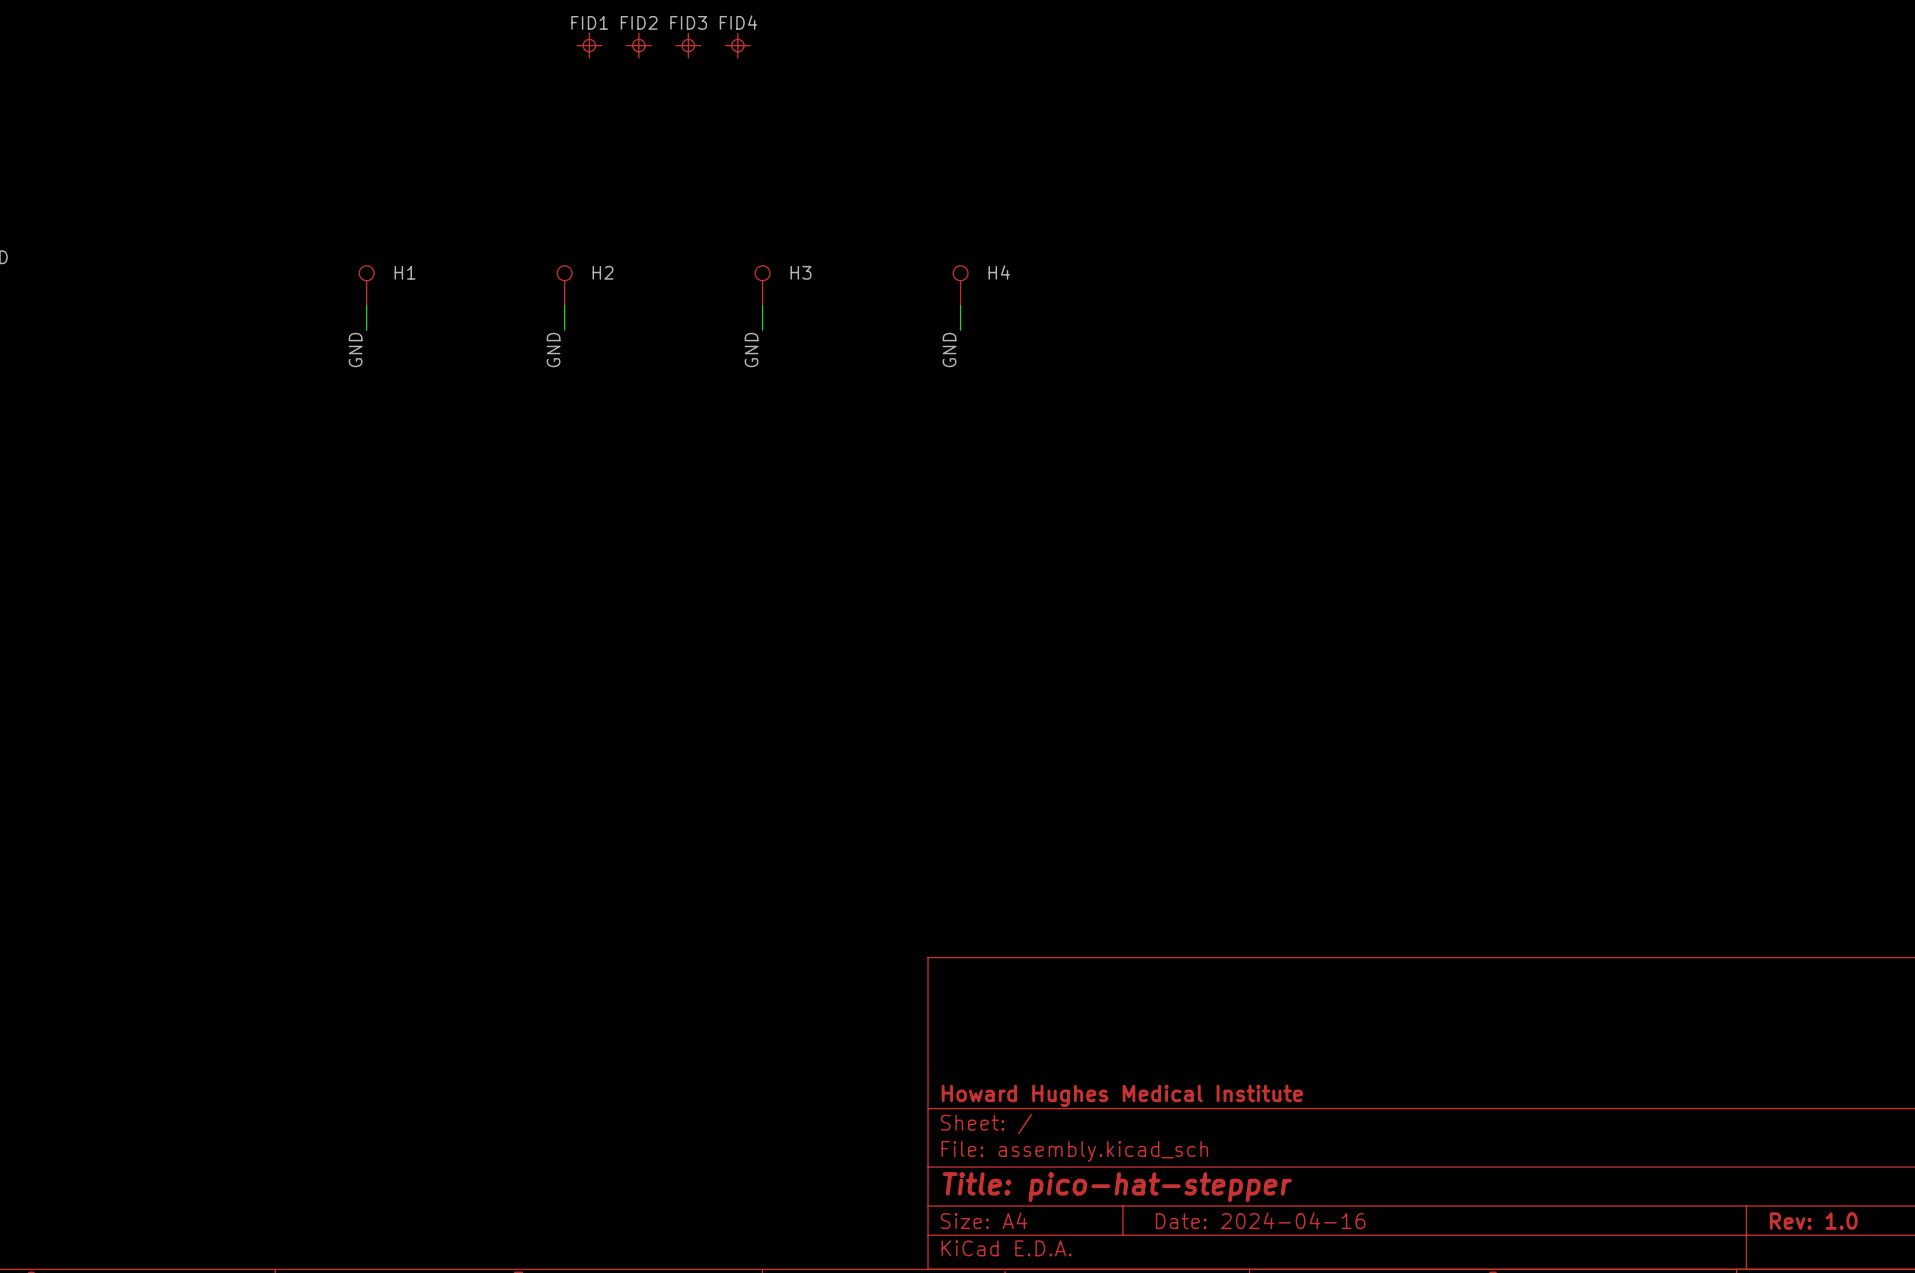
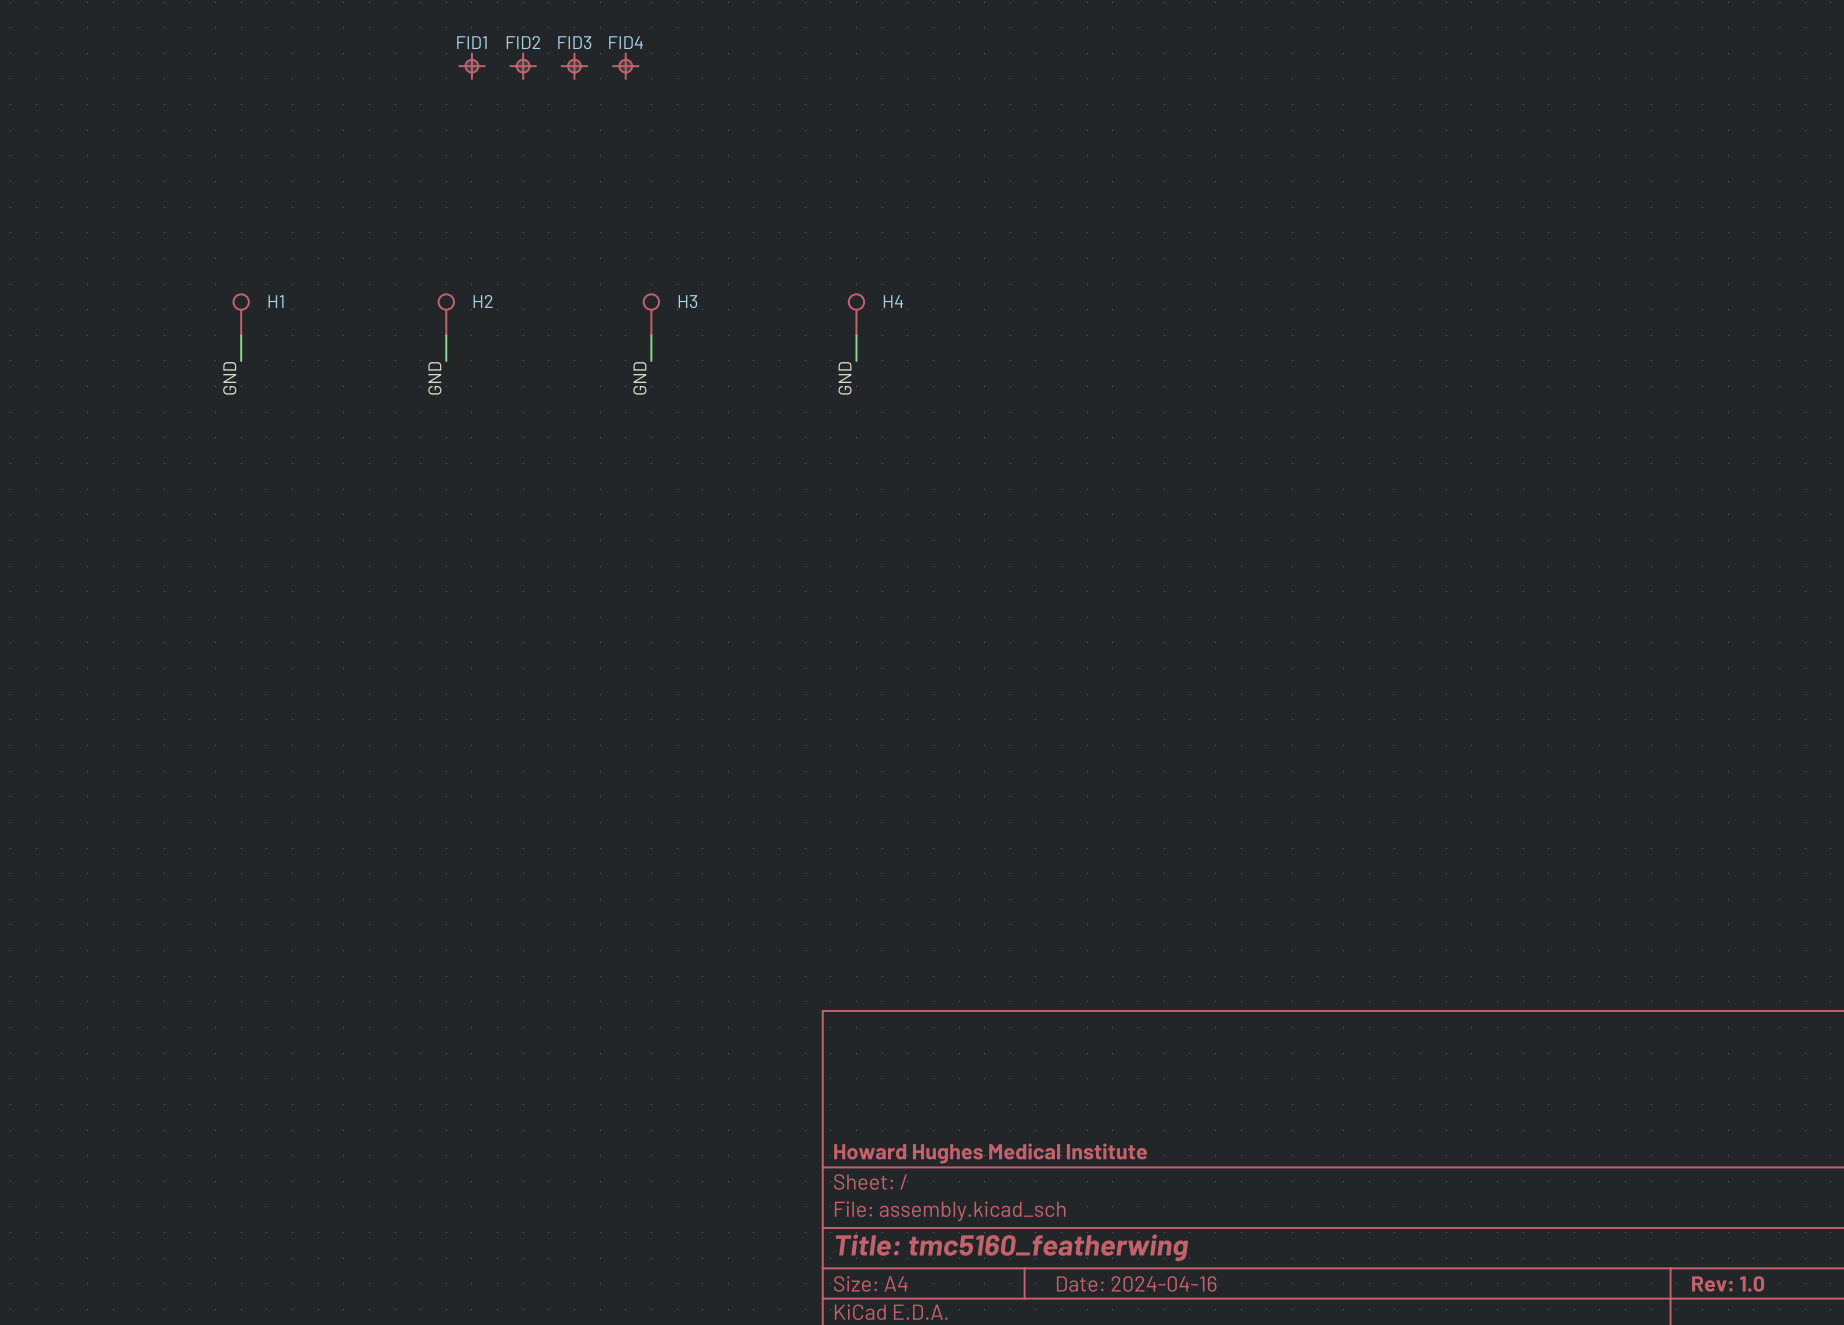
title block: Title: pico-hat-stepper (1117, 1187) -> Title: tmc5160_featherwing (1011, 1247)

